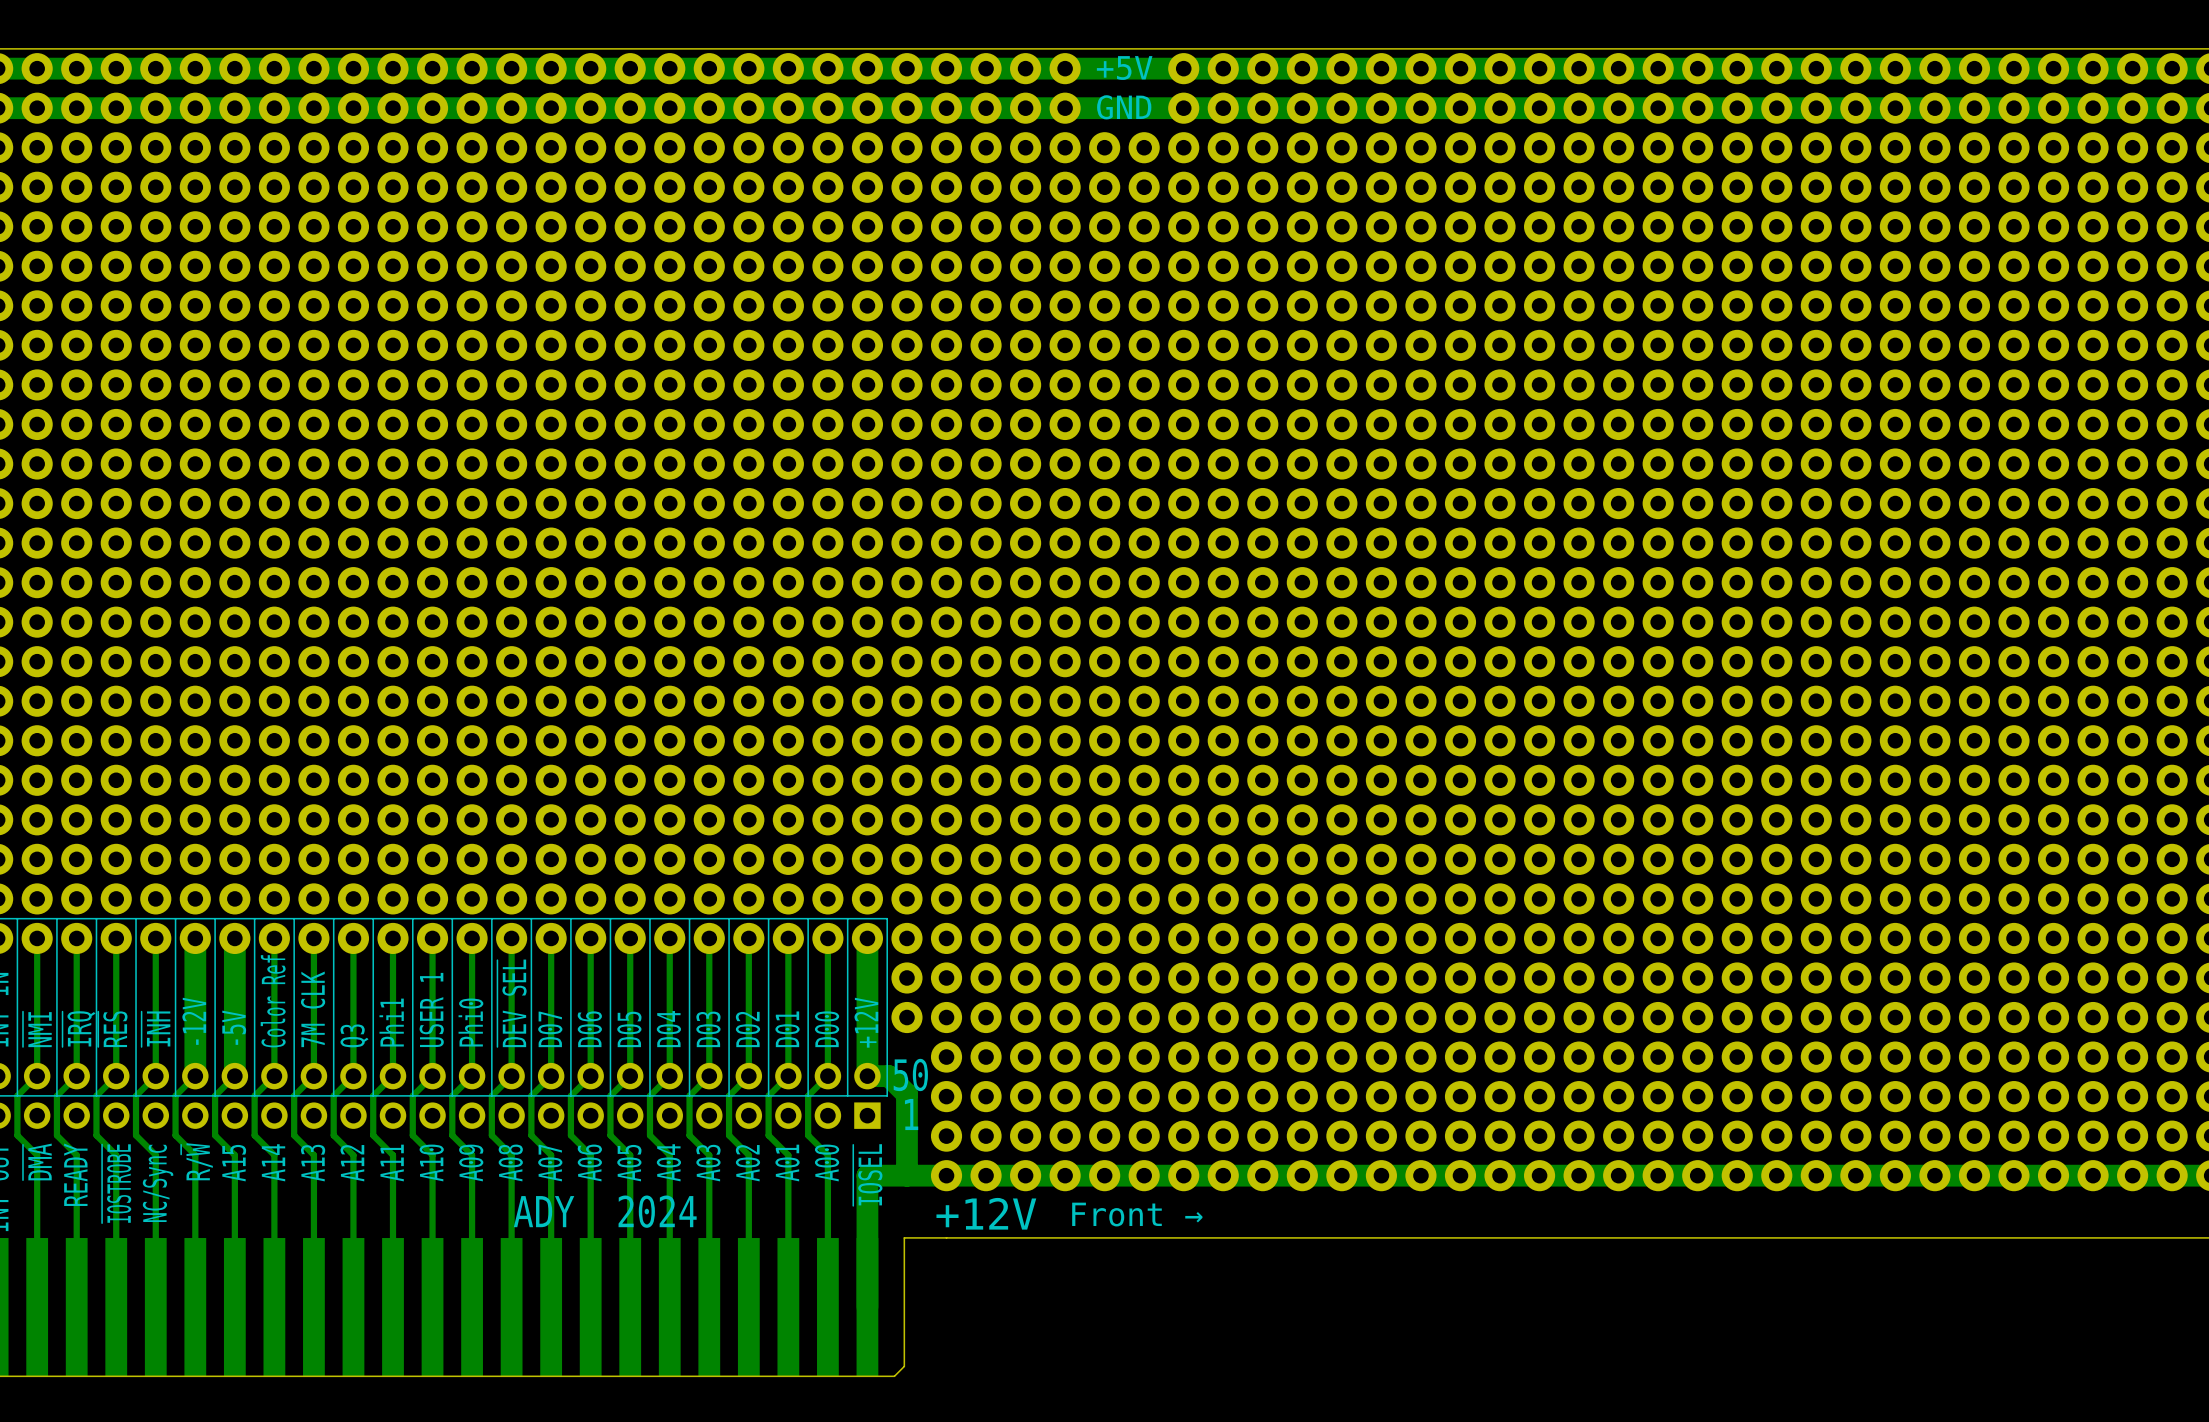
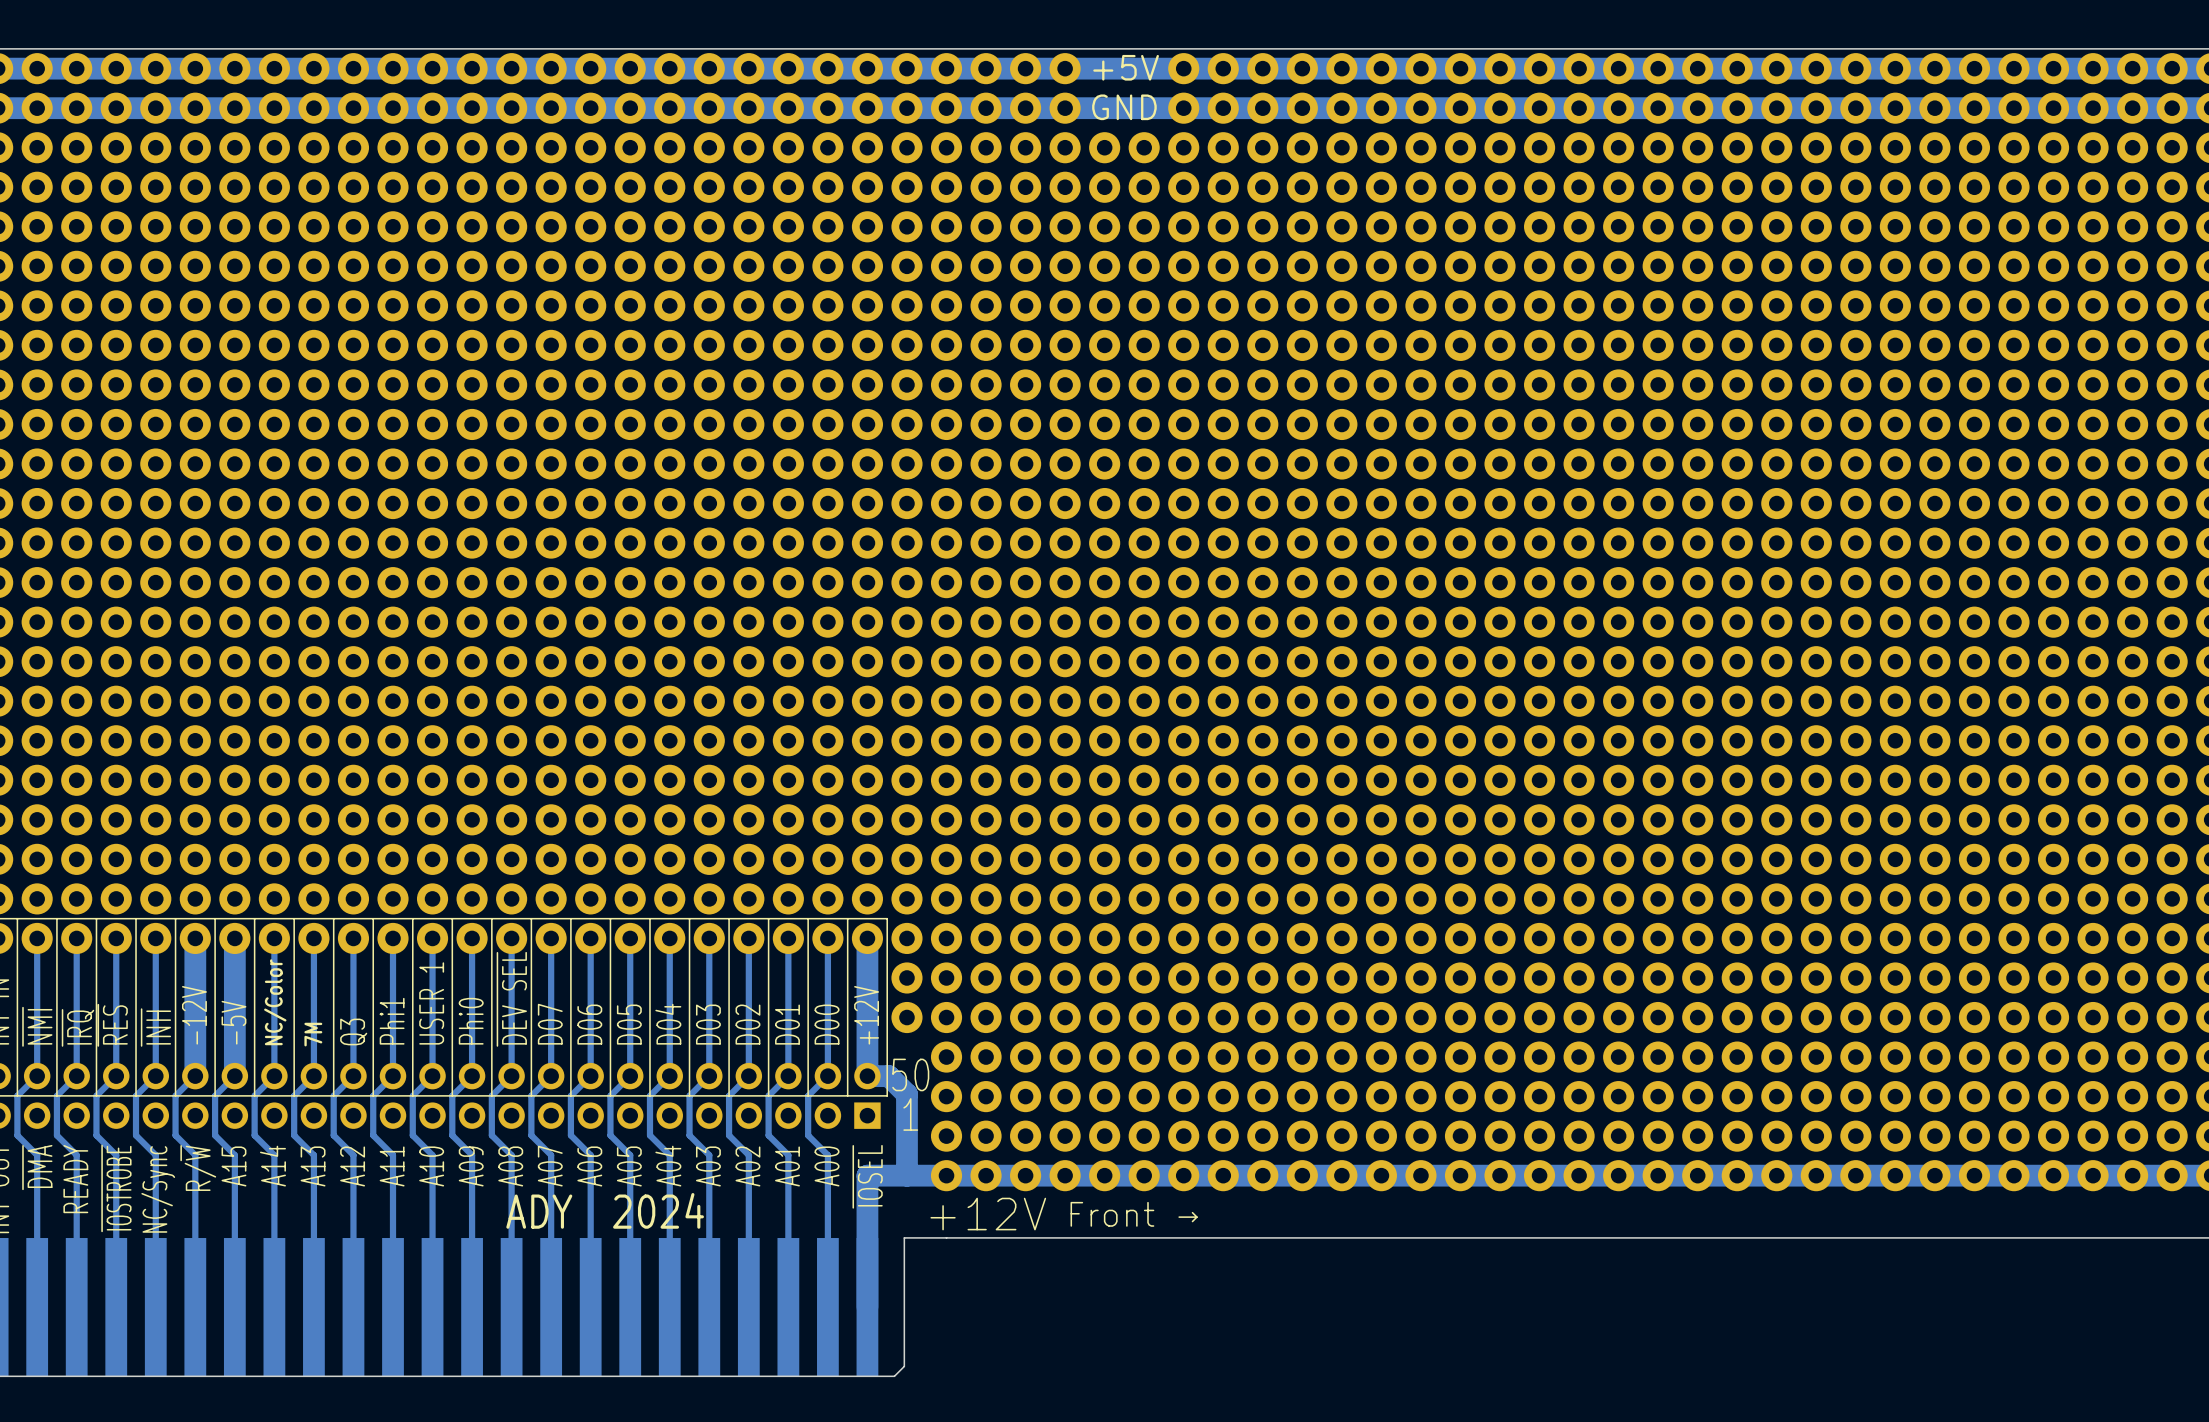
text: Color Ref (273, 1001) -> NC/Color (275, 1002)
text: 7M CLK (313, 1009) -> 7M (313, 1034)

